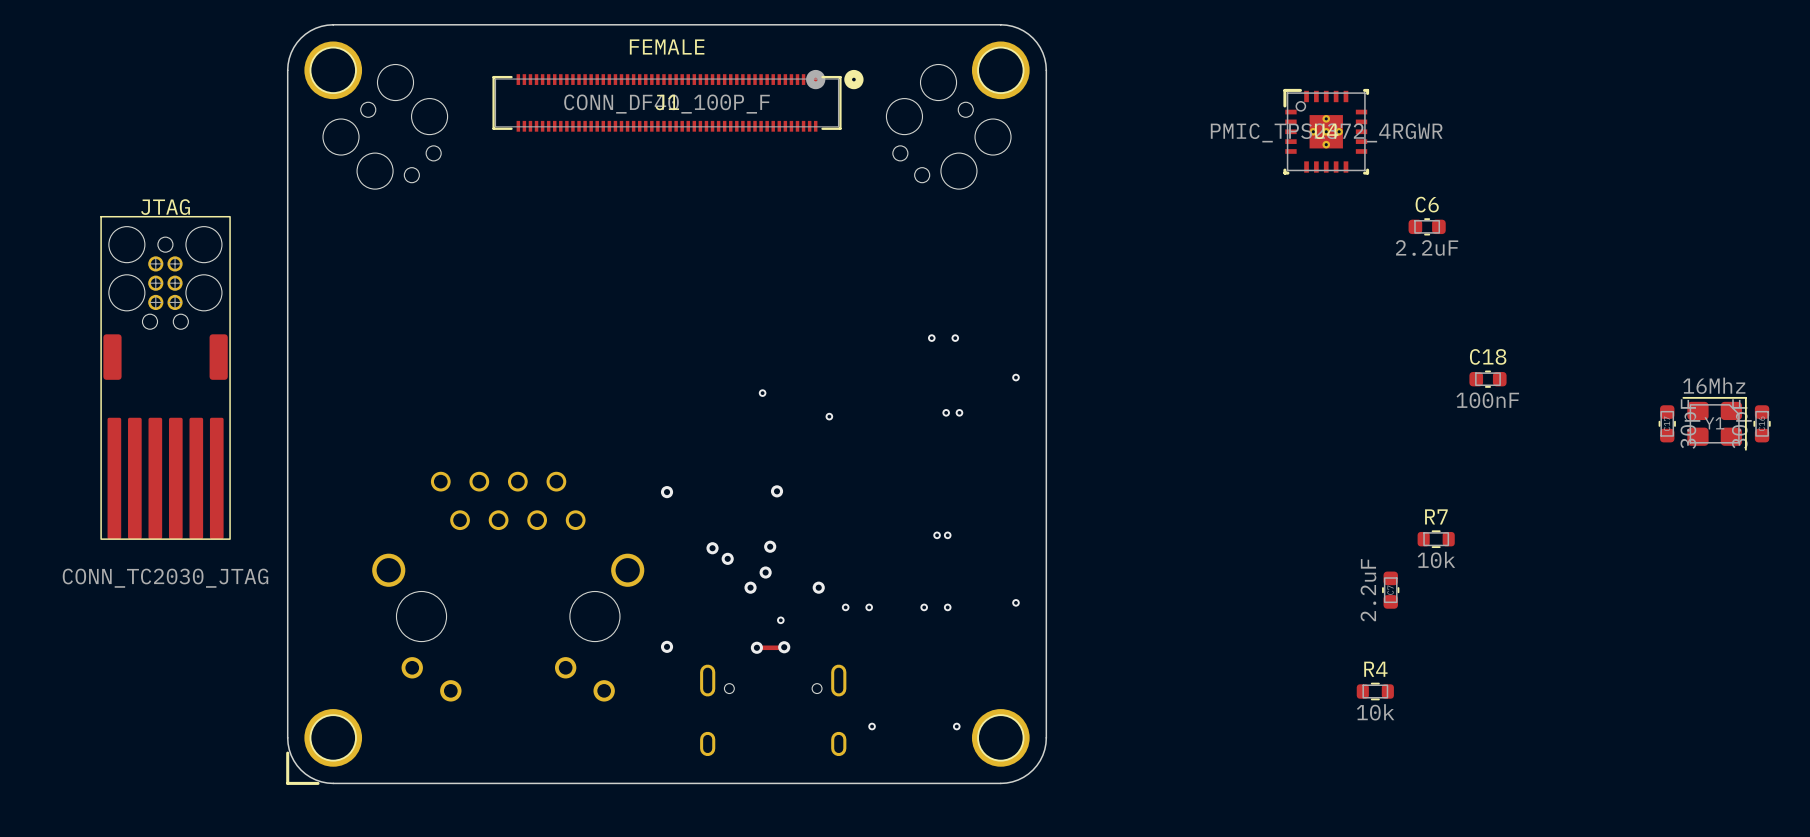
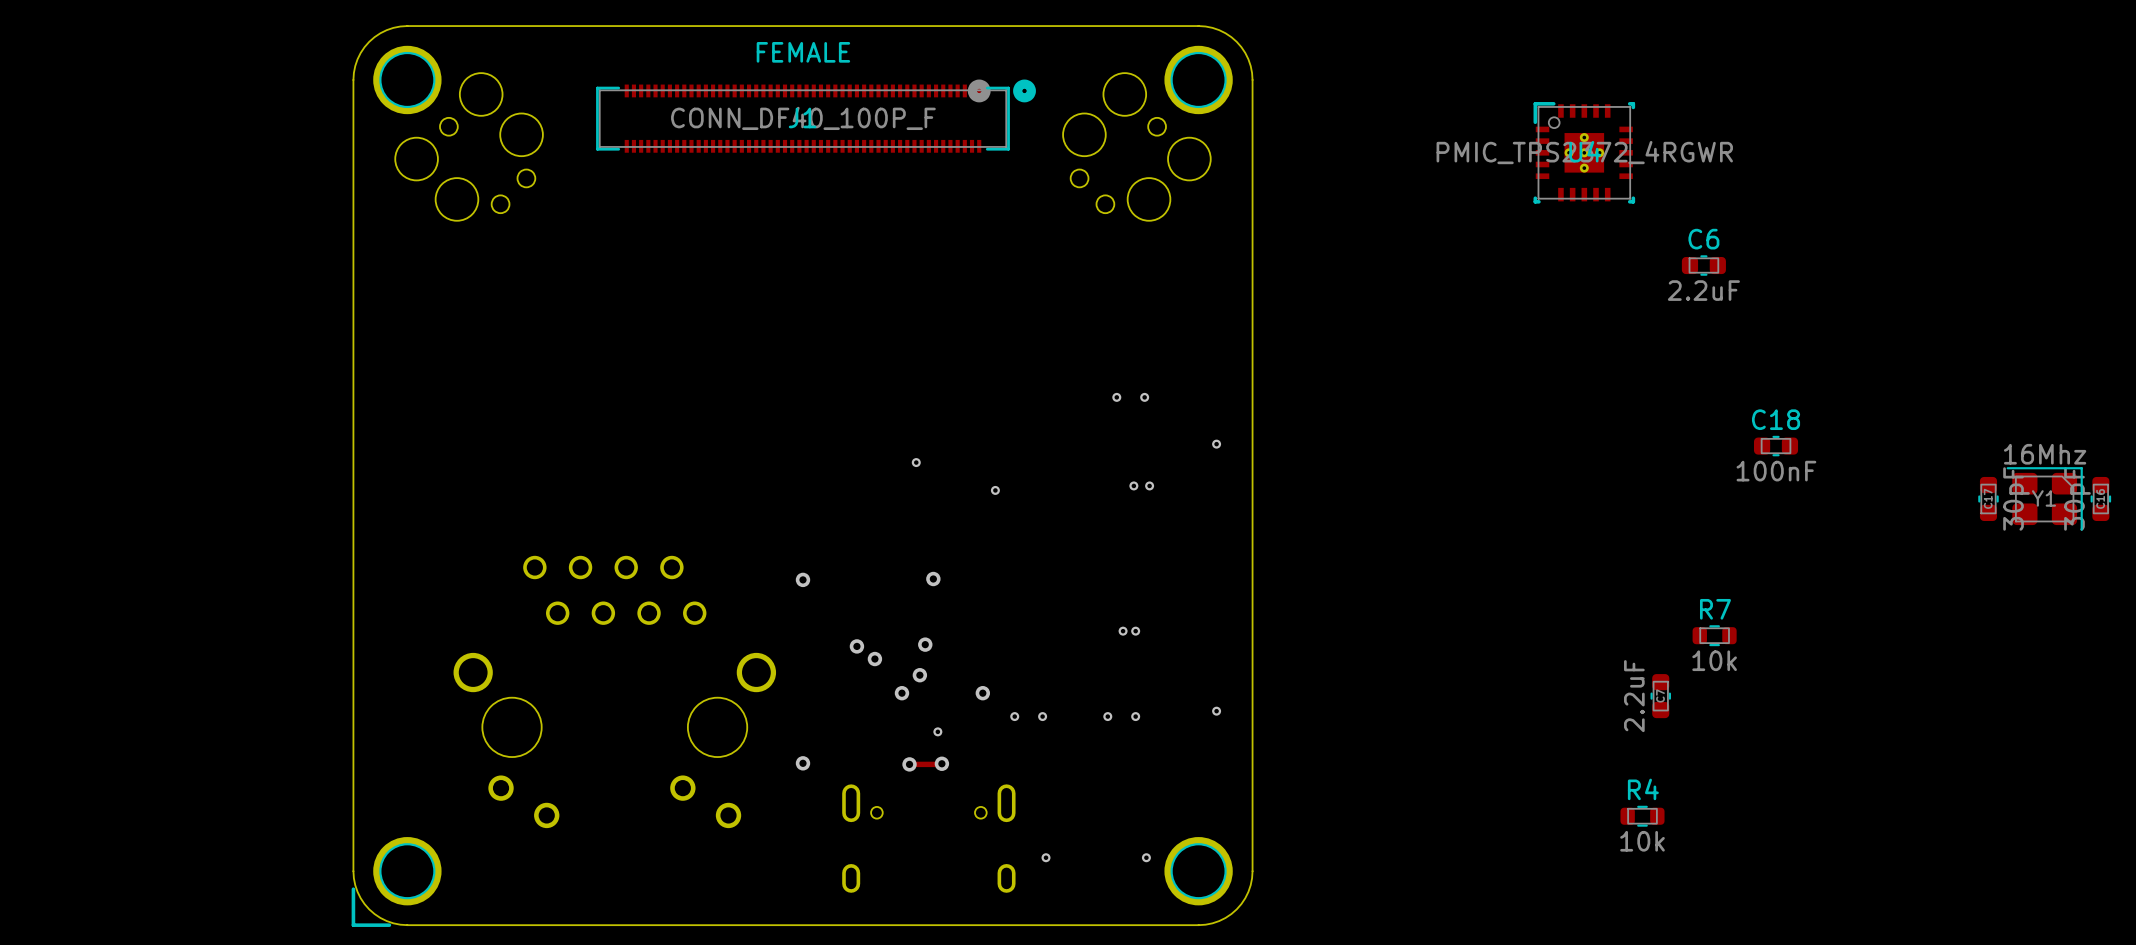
JTAG: CONN_TC2030_JTAG (165, 377) -> none

